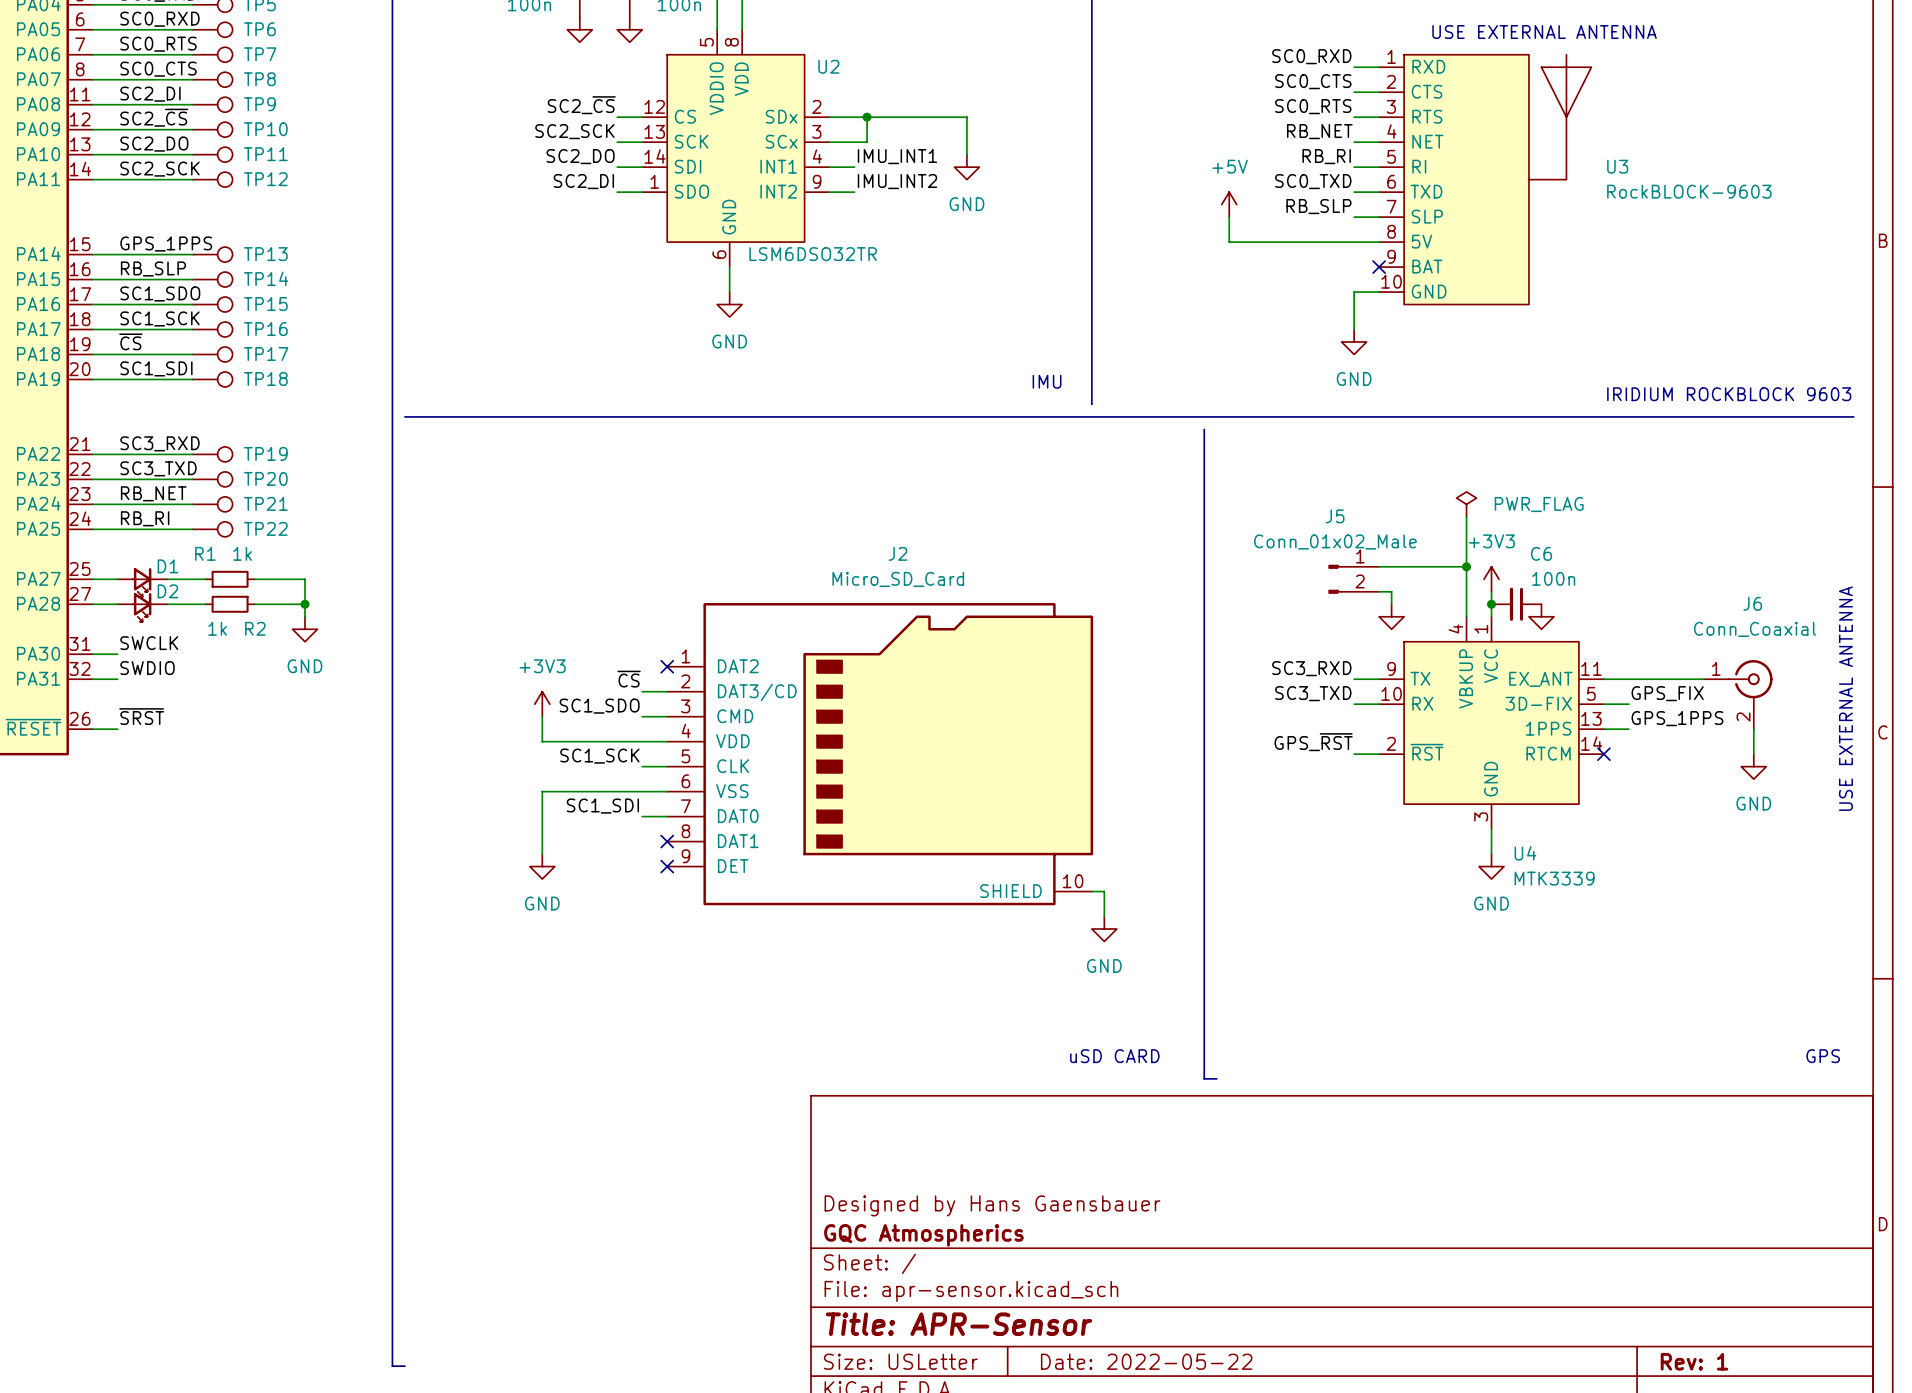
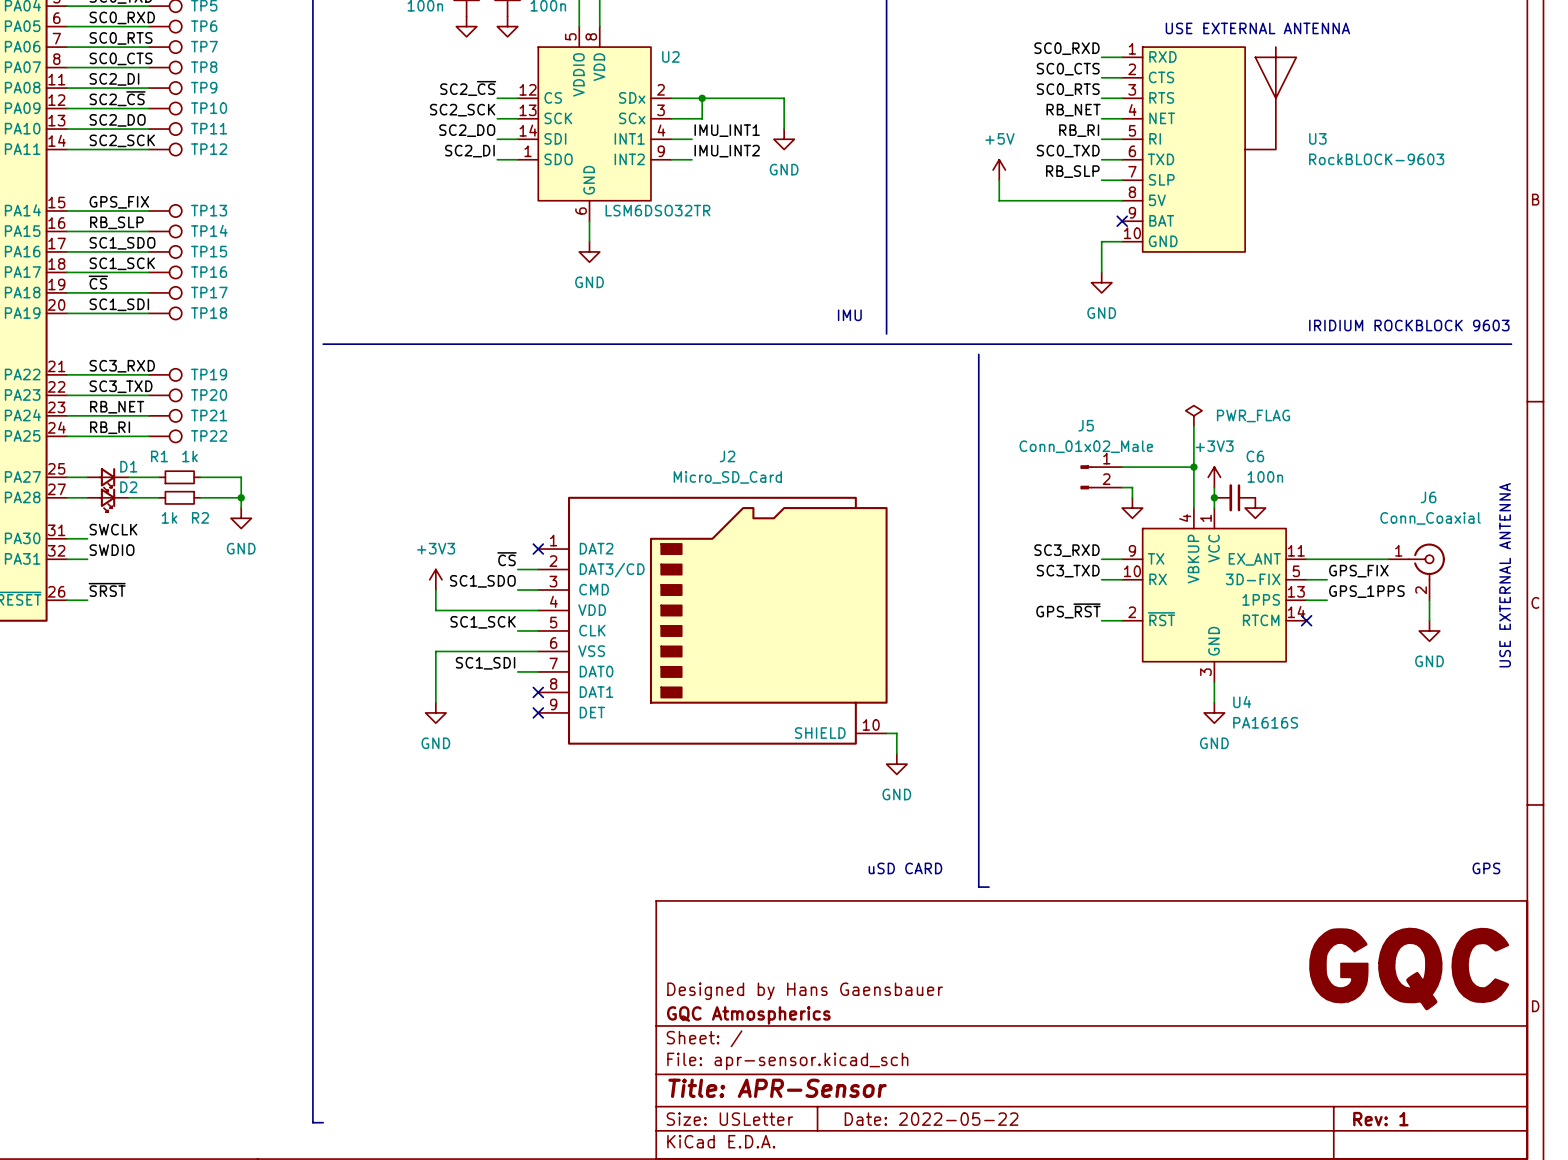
label: GPS_1PPS (166, 244) -> GPS_FIX (119, 202)
U4 value: MTK3339 (1554, 878) -> PA1616S (1265, 722)
part: none -> (1409, 968)

